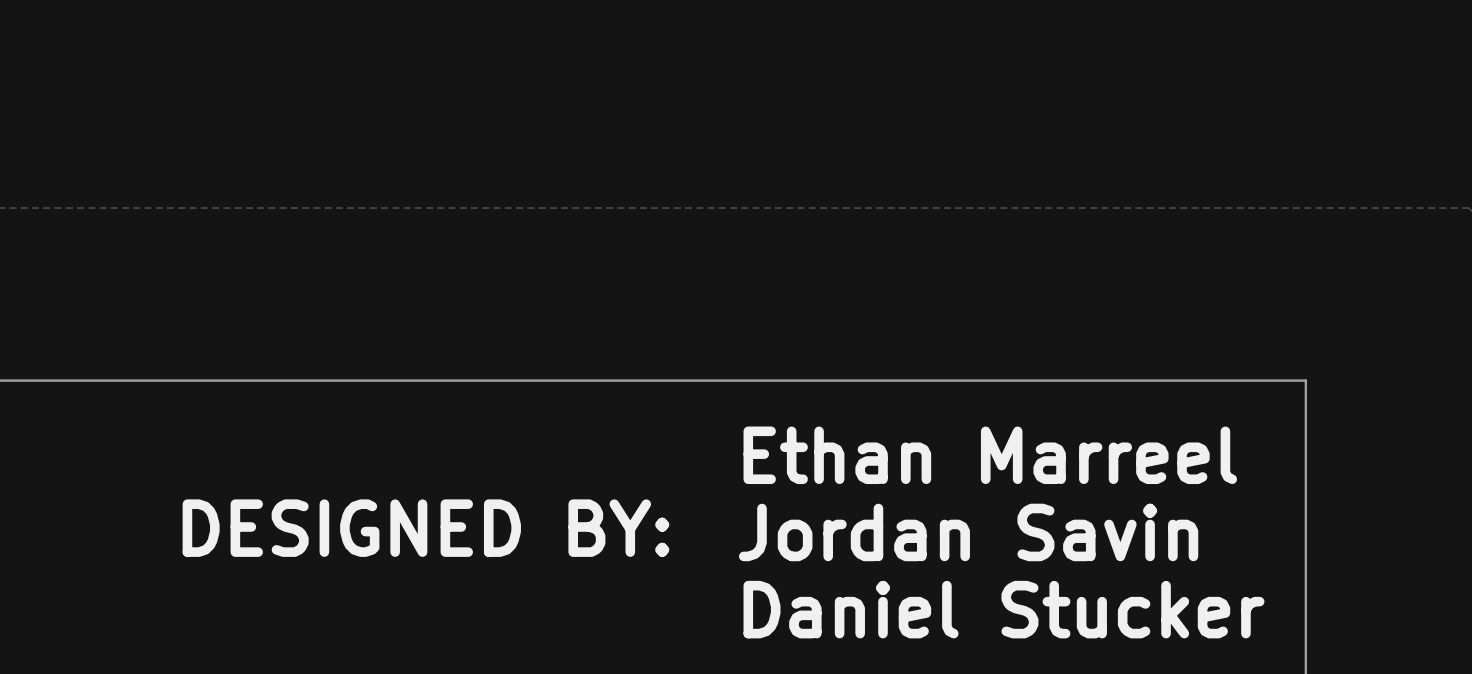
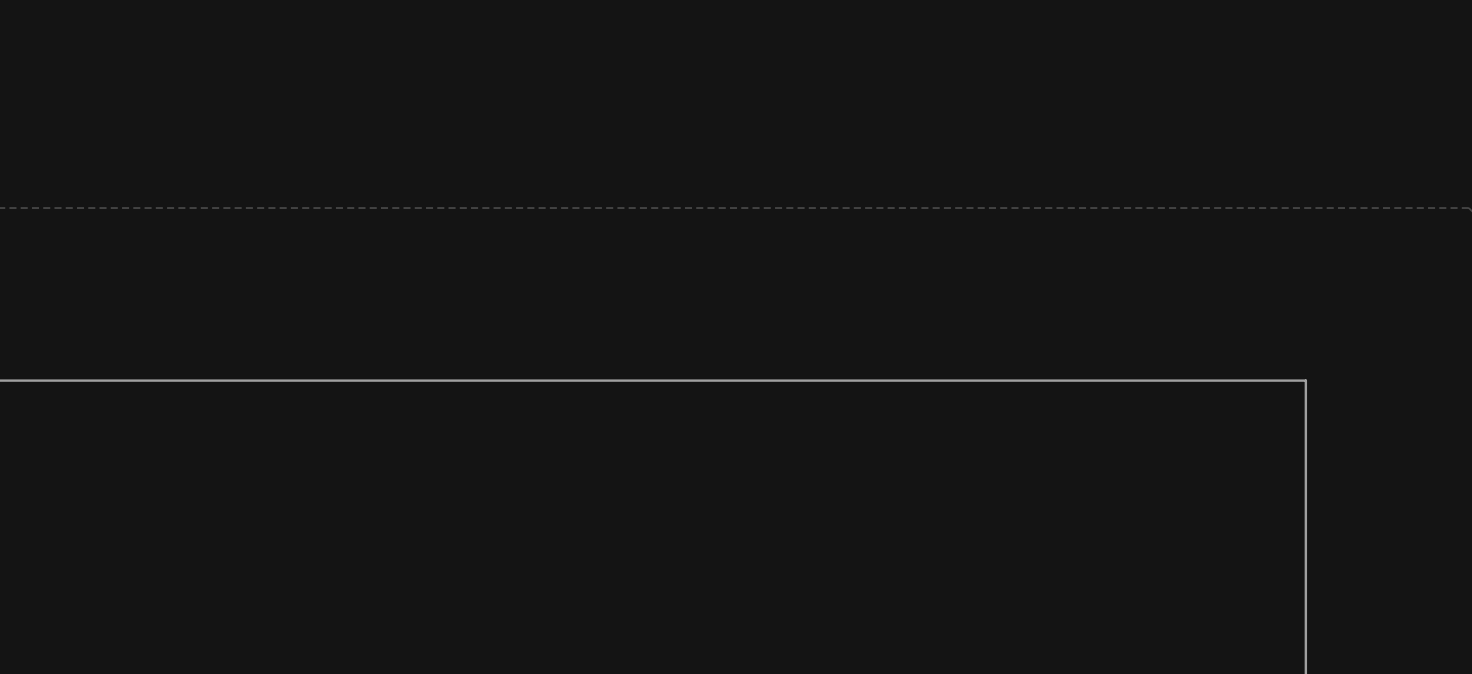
text: Ethan Marreel (990, 455) -> none
text: DESIGNED BY: (425, 528) -> none
text: Jordan Savin (968, 532) -> none
text: Daniel Stucker (1003, 609) -> none

